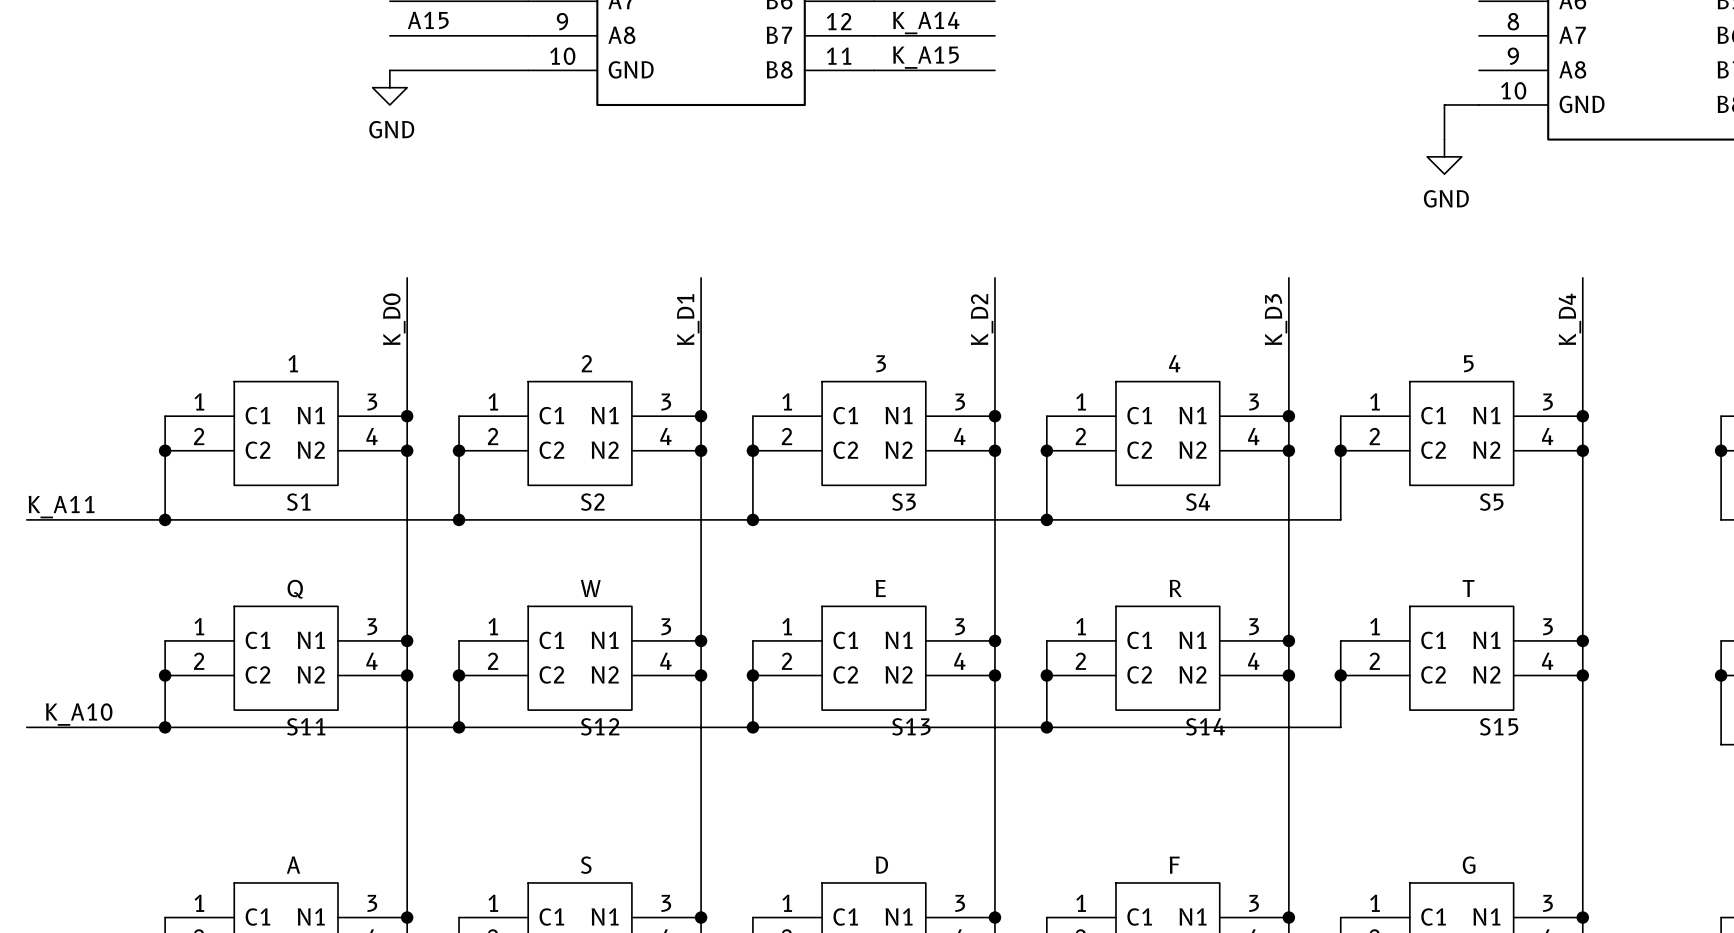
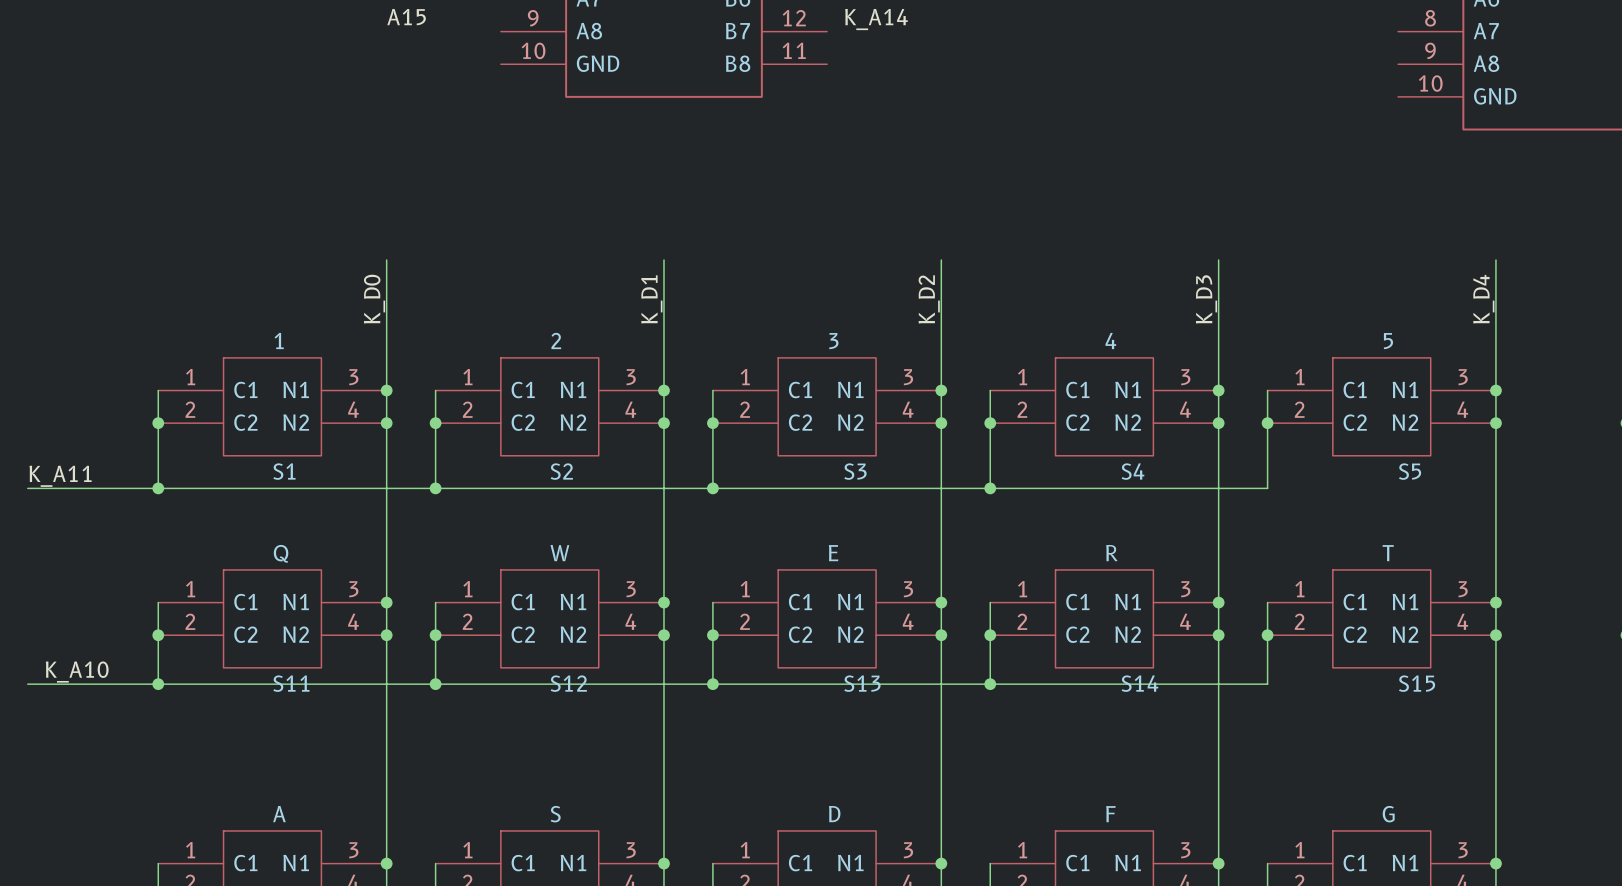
wire: (389, 35) (528, 35) -> none
wire: (873, 35) (994, 35) -> none
label: K_A15 (925, 57) -> none
wire: (389, 70) (528, 70) -> none
wire: (873, 70) (994, 70) -> none
power symbol: GND (389, 87) -> none
wire: (1479, 104) (1444, 104) (1444, 139) -> none
power symbol: GND (1444, 156) -> none

